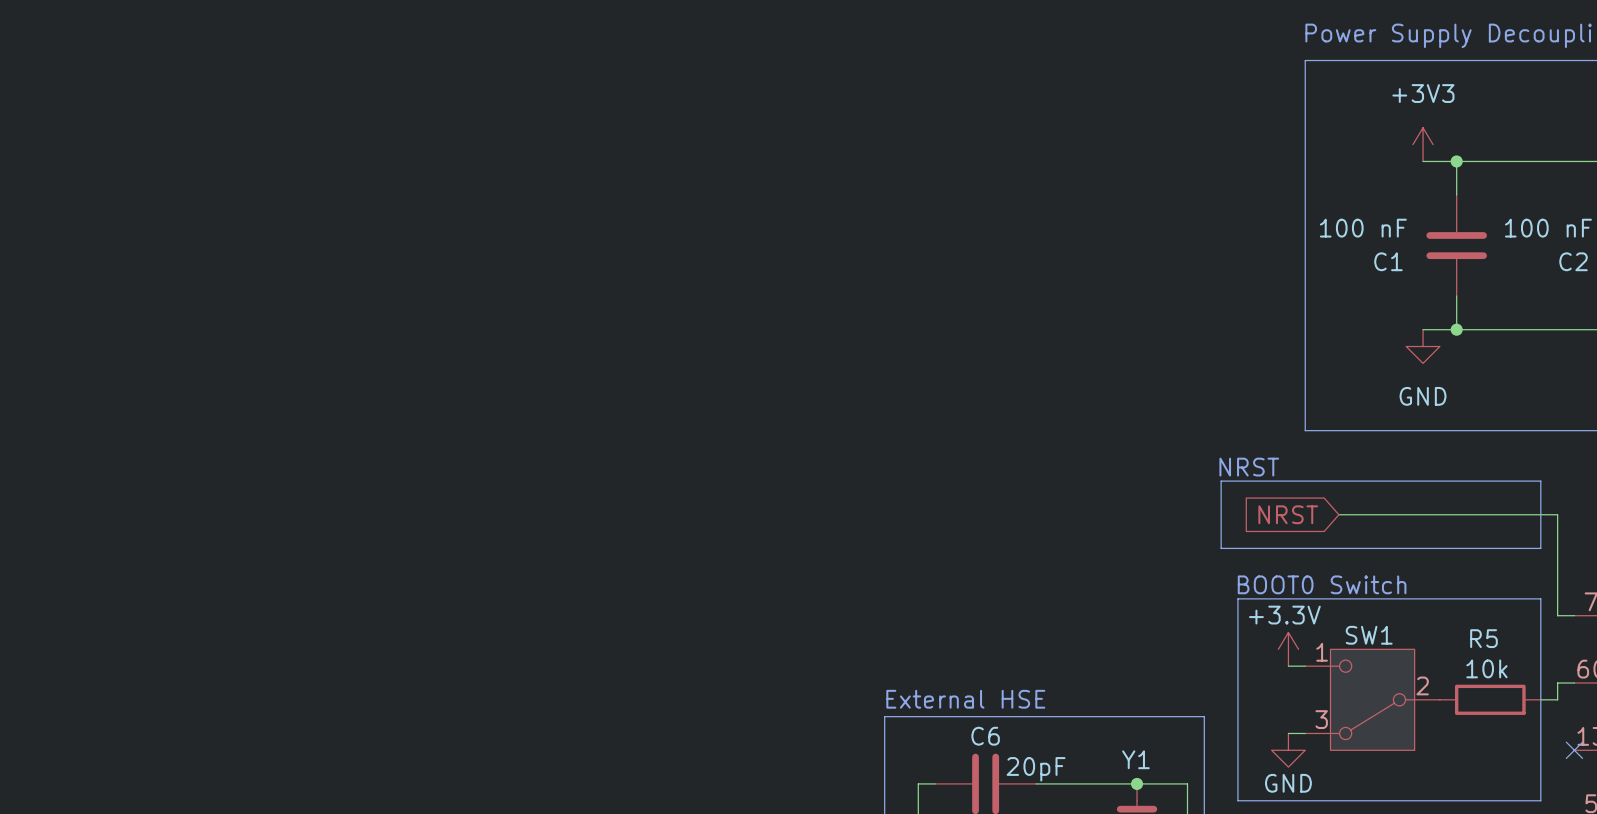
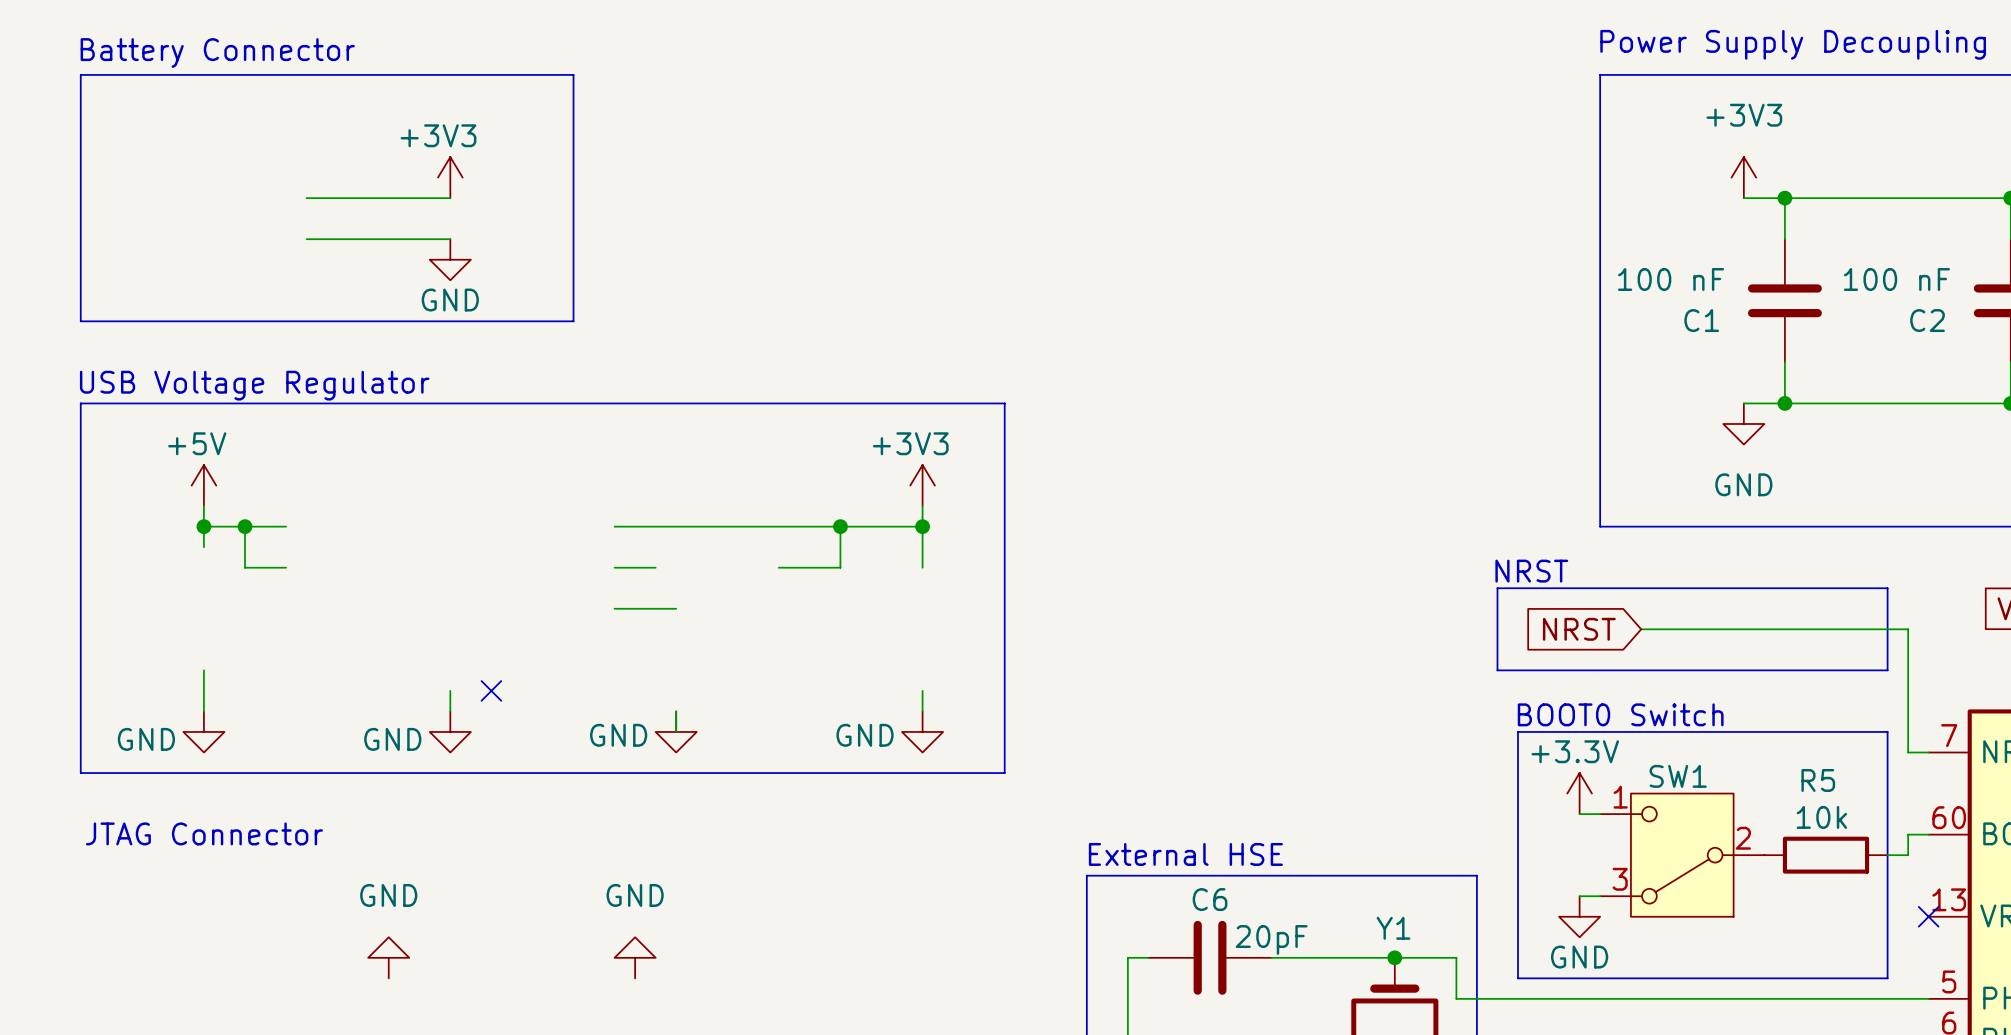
text: none -> Battery Connector (217, 53)
line: none -> (80, 74) (573, 74) (573, 321) (80, 321) (80, 74)
power symbol: none -> +3V3 (450, 177)
wire: none -> (306, 198) (450, 198)
wire: none -> (306, 239) (450, 239)
power symbol: none -> GND (450, 259)
text: none -> USB Voltage Regulator (254, 385)
line: none -> (80, 403) (1004, 403) (1004, 773) (80, 773) (80, 403)
power symbol: none -> +5V (203, 485)
power symbol: none -> +3V3 (922, 485)
wire: none -> (203, 506) (203, 547)
wire: none -> (922, 506) (922, 567)
wire: none -> (203, 526) (286, 526)
junction: none -> (203, 526)
wire: none -> (245, 526) (245, 567) (286, 567)
junction: none -> (245, 526)
wire: none -> (614, 526) (922, 526)
wire: none -> (840, 526) (840, 567) (778, 567)
junction: none -> (840, 526)
junction: none -> (922, 526)
wire: none -> (614, 567) (655, 567)
wire: none -> (614, 608) (676, 608)
wire: none -> (203, 670) (203, 711)
wire: none -> (450, 690) (450, 711)
no-connect mark: none -> (491, 690)
wire: none -> (922, 690) (922, 711)
wire: none -> (676, 711) (676, 731)
power symbol: none -> GND (203, 731)
power symbol: none -> GND (450, 731)
power symbol: none -> GND (676, 731)
power symbol: none -> GND (922, 731)
text: none -> JTAG Connector (204, 833)
power symbol: none -> GND (388, 957)
power symbol: none -> GND (635, 957)

